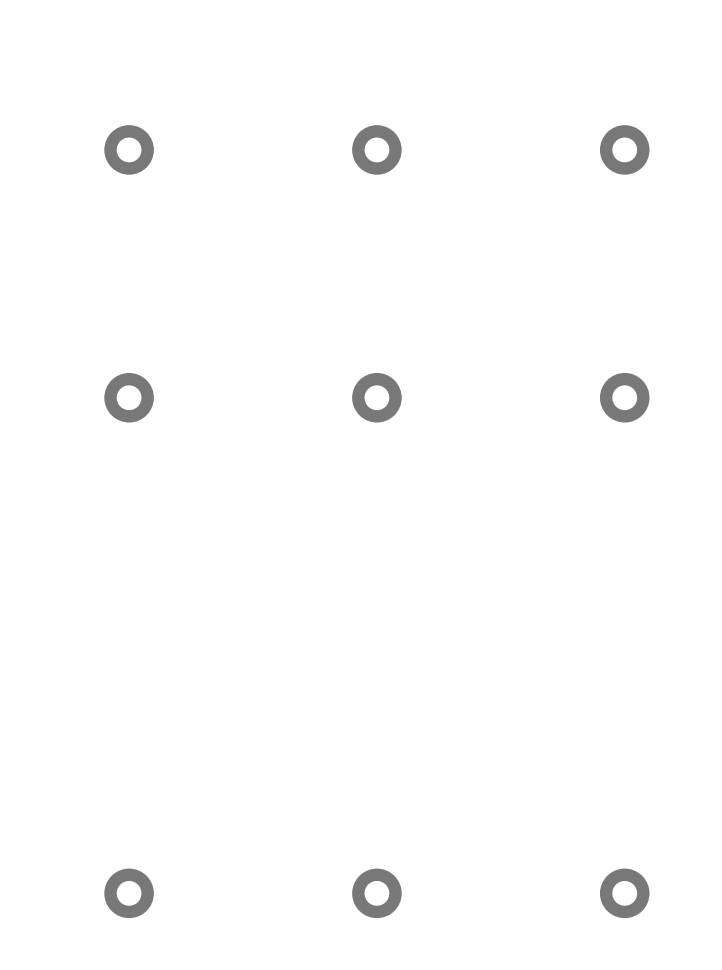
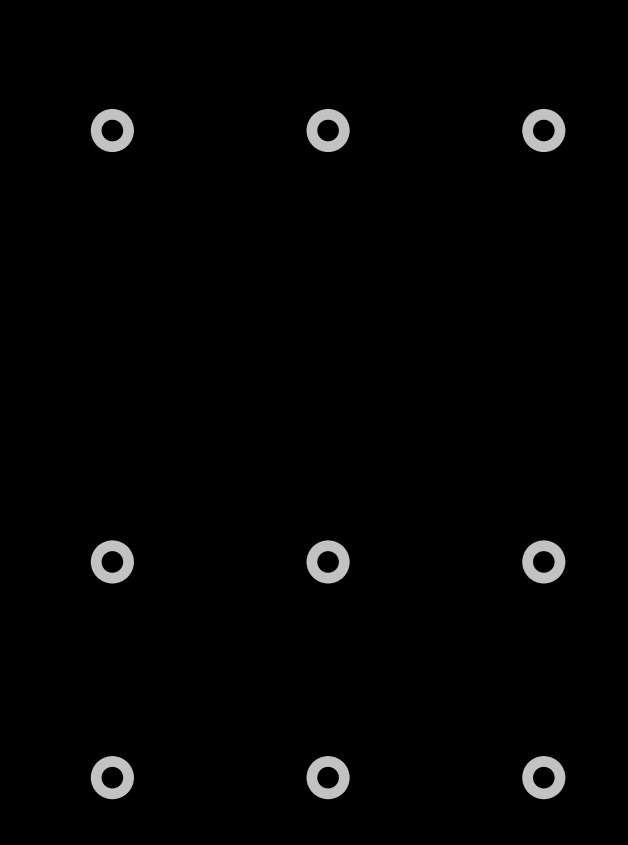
via: (129, 397) -> none
via: (376, 397) -> none
via: (624, 397) -> none
via: none -> (112, 561)
via: none -> (328, 561)
via: none -> (543, 561)

